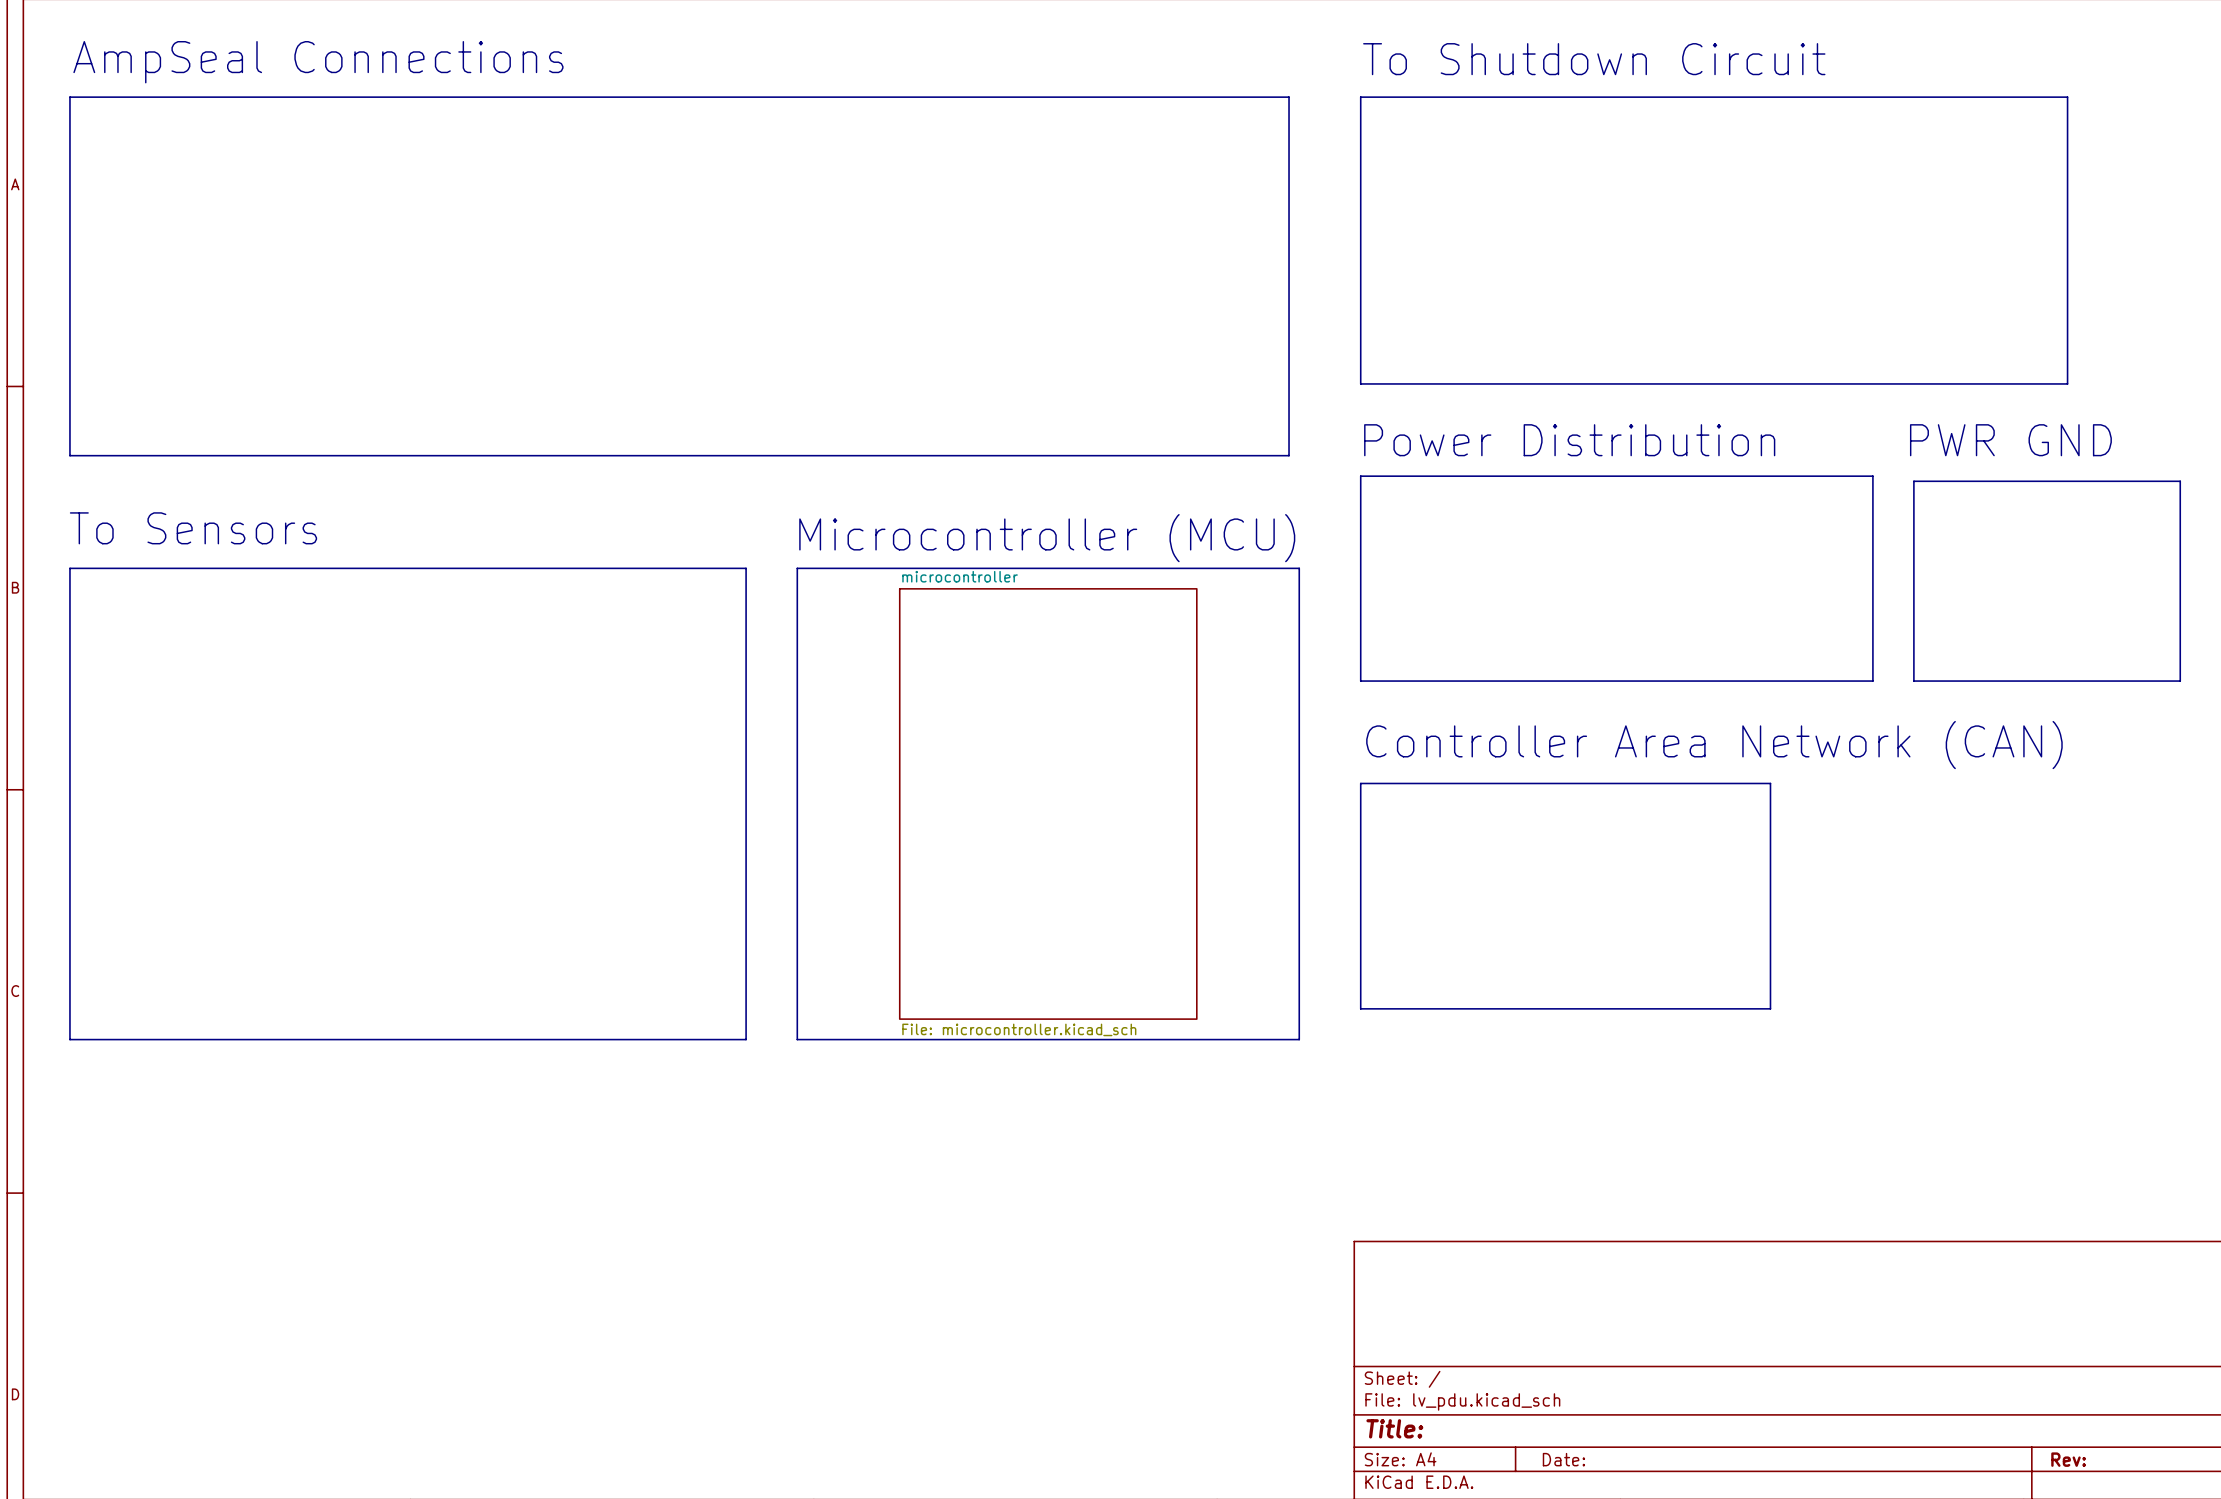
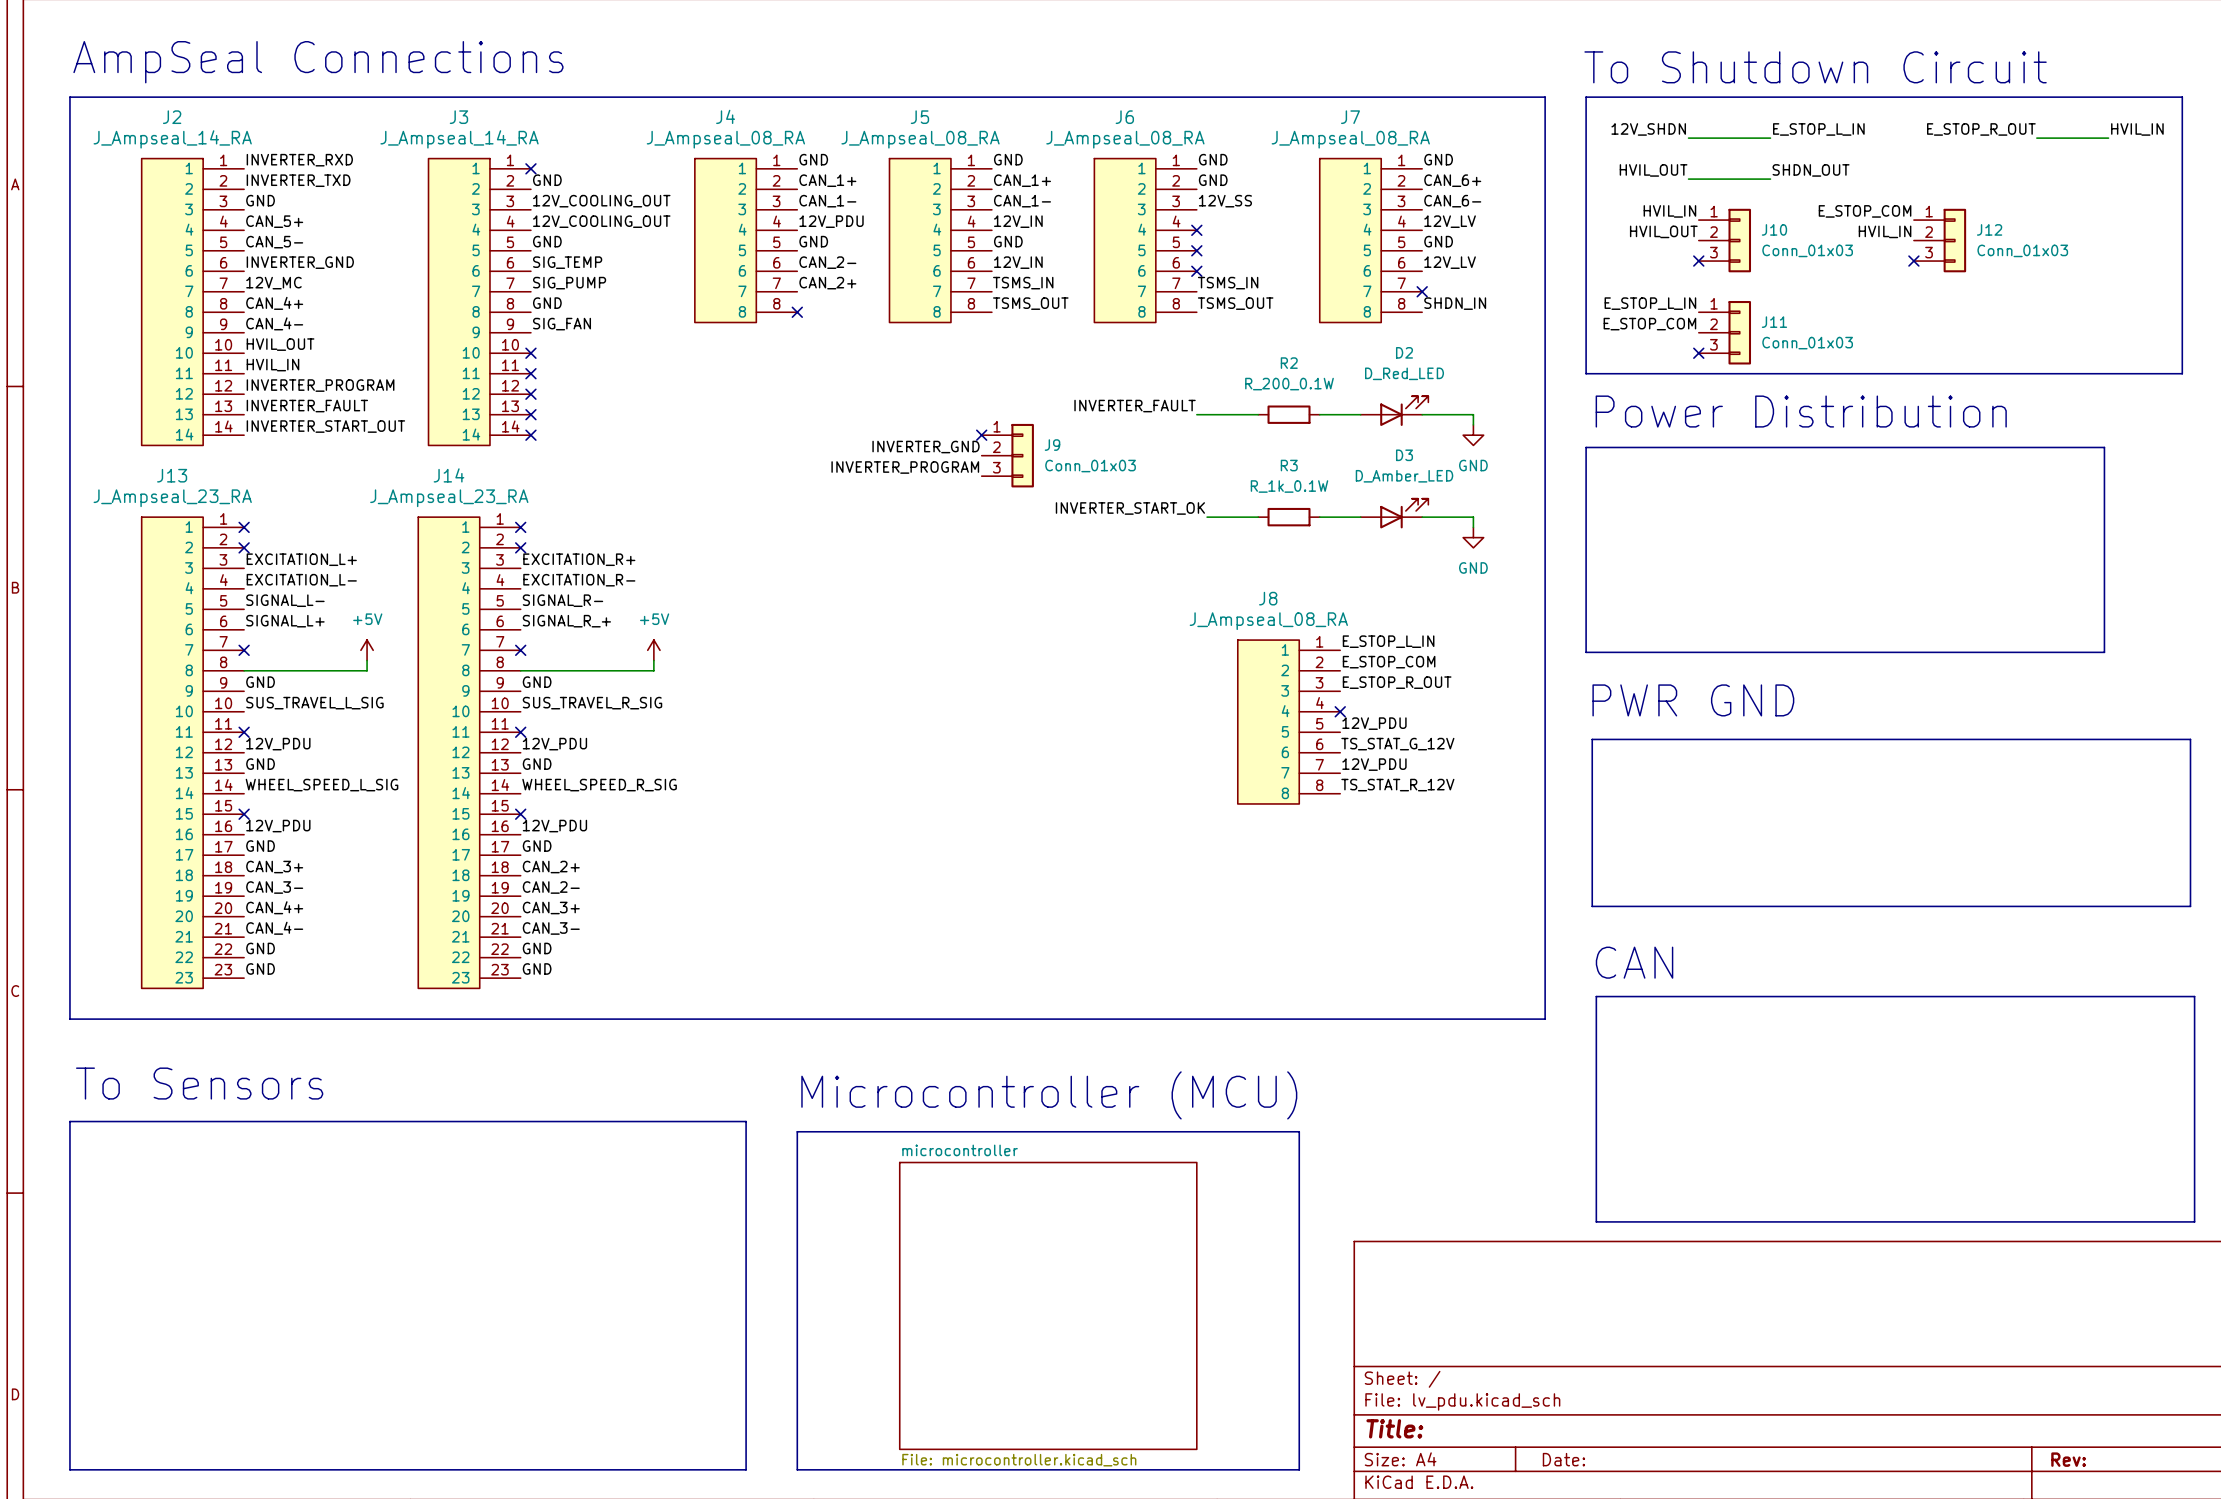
text: To Shutdown Circuit (1594, 59) -> none
text: none -> To Shutdown Circuit (1815, 67)
line: (1289, 97) (1289, 455) (69, 455) -> (1289, 97) (1360, 97)
line: (1360, 97) (1360, 383) (2067, 383) (2067, 97) -> (1586, 97) (1586, 373) (2182, 373) (2182, 97) (2067, 97)
line: (1545, 97) (1586, 97) -> (1545, 97) (1545, 1019) (69, 1019)
label: none -> 12V_SHDN (1648, 129)
label: none -> E_STOP_L_IN (1818, 129)
label: none -> E_STOP_R_OUT (1981, 129)
label: none -> HVIL_IN (2137, 129)
wire: none -> (1688, 138) (1770, 138)
wire: none -> (2036, 138) (2108, 138)
label: none -> GND (813, 159)
label: none -> GND (1008, 159)
label: none -> GND (1213, 159)
label: none -> GND (1438, 159)
label: none -> INVERTER_RXD (299, 160)
no-connect mark: none -> (530, 168)
label: none -> HVIL_OUT (1653, 170)
label: none -> SHDN_OUT (1811, 170)
wire: none -> (1688, 179) (1770, 179)
label: none -> INVERTER_TXD (298, 180)
label: none -> GND (547, 180)
label: none -> CAN_1+ (827, 180)
label: none -> CAN_1+ (1022, 180)
label: none -> GND (1213, 180)
label: none -> CAN_6+ (1452, 180)
label: none -> GND (260, 200)
label: none -> 12V_COOLING_OUT (601, 201)
label: none -> CAN_1- (827, 201)
label: none -> CAN_1- (1022, 201)
label: none -> 12V_SS (1225, 201)
label: none -> CAN_6- (1452, 201)
label: none -> HVIL_IN (1669, 211)
label: none -> E_STOP_COM (1865, 211)
label: none -> CAN_5+ (274, 221)
label: none -> 12V_COOLING_OUT (601, 221)
label: none -> 12V_PDU (831, 221)
label: none -> 12V_IN (1018, 221)
label: none -> 12V_LV (1450, 221)
no-connect mark: none -> (1196, 230)
label: none -> HVIL_OUT (1663, 231)
label: none -> HVIL_IN (1885, 231)
J4: none -> J_Ampseal_08_RA (746, 240)
J5: none -> J_Ampseal_08_RA (940, 240)
J6: none -> J_Ampseal_08_RA (1145, 240)
J7: none -> J_Ampseal_08_RA (1370, 240)
J10: none -> Conn_01x03 (1724, 240)
J12: none -> Conn_01x03 (1940, 240)
label: none -> GND (547, 241)
label: none -> GND (813, 241)
label: none -> GND (1008, 241)
label: none -> GND (1438, 241)
label: none -> CAN_5- (274, 242)
no-connect mark: none -> (1196, 250)
no-connect mark: none -> (1698, 261)
no-connect mark: none -> (1913, 261)
label: none -> INVERTER_GND (300, 262)
label: none -> SIG_TEMP (567, 262)
label: none -> CAN_2- (827, 262)
label: none -> 12V_IN (1018, 262)
label: none -> 12V_LV (1450, 262)
no-connect mark: none -> (1196, 271)
label: none -> 12V_MC (273, 283)
label: none -> SIG_PUMP (569, 283)
label: none -> CAN_2+ (827, 283)
label: none -> TSMS_IN (1023, 283)
label: none -> TSMS_IN (1228, 283)
no-connect mark: none -> (1422, 291)
J2: none -> J_Ampseal_14_RA (192, 302)
J3: none -> J_Ampseal_14_RA (479, 302)
label: none -> CAN_4+ (274, 303)
label: none -> GND (547, 303)
label: none -> TSMS_OUT (1030, 303)
label: none -> TSMS_OUT (1235, 303)
label: none -> SHDN_IN (1455, 303)
label: none -> E_STOP_L_IN (1650, 303)
no-connect mark: none -> (797, 312)
label: none -> CAN_4- (274, 323)
label: none -> SIG_FAN (562, 324)
label: none -> E_STOP_COM (1649, 324)
J11: none -> Conn_01x03 (1724, 332)
label: none -> HVIL_OUT (280, 344)
no-connect mark: none -> (530, 353)
no-connect mark: none -> (1698, 353)
label: none -> HVIL_IN (272, 365)
no-connect mark: none -> (530, 373)
label: none -> INVERTER_PROGRAM (320, 385)
no-connect mark: none -> (530, 394)
label: none -> INVERTER_FAULT (307, 406)
label: none -> INVERTER_FAULT (1135, 406)
D2: none -> D_Red_LED (1394, 411)
text: none -> Power Distribution (1801, 411)
no-connect mark: none -> (530, 414)
wire: none -> (1196, 414) (1258, 414)
R2: none -> R_200_0.1W (1289, 414)
wire: none -> (1319, 414) (1360, 414)
wire: none -> (1422, 414) (1473, 414) (1473, 424)
label: none -> INVERTER_START_OUT (325, 426)
no-connect mark: none -> (530, 435)
no-connect mark: none -> (981, 435)
power symbol: none -> GND (1473, 435)
text: Power Distribution (1569, 440) -> none
text: PWR GND (2010, 440) -> none
label: none -> INVERTER_GND (926, 447)
line: none -> (1586, 447) (2104, 447) (2104, 652) (1586, 652) (1586, 447)
J9: none -> Conn_01x03 (1007, 455)
label: none -> INVERTER_PROGRAM (905, 467)
line: (1360, 476) (1872, 476) (1872, 681) (1360, 681) (1360, 476) -> none
line: (1913, 481) (2180, 481) (2180, 681) (1913, 681) (1913, 481) -> none
label: none -> INVERTER_START_OK (1130, 508)
D3: none -> D_Amber_LED (1394, 513)
wire: none -> (1207, 517) (1258, 517)
R3: none -> R_1k_0.1W (1289, 517)
wire: none -> (1319, 517) (1360, 517)
wire: none -> (1422, 517) (1473, 517) (1473, 527)
no-connect mark: none -> (244, 527)
no-connect mark: none -> (520, 527)
text: To Sensors (193, 528) -> none
power symbol: none -> GND (1473, 537)
text: Microcontroller (MCU) (1047, 538) -> none
no-connect mark: none -> (244, 547)
no-connect mark: none -> (520, 547)
label: none -> EXCITATION_L+ (301, 559)
label: none -> EXCITATION_R+ (579, 559)
line: (69, 568) (746, 568) (746, 1039) (69, 1039) (69, 1019) -> (69, 568) (69, 455)
line: (797, 568) (1299, 568) (1299, 1039) (797, 1039) (797, 568) -> none
label: none -> EXCITATION_L- (301, 580)
label: none -> EXCITATION_R- (579, 580)
label: none -> SIGNAL_L- (285, 600)
label: none -> SIGNAL_R- (562, 600)
label: none -> SIGNAL_L+ (285, 621)
label: none -> SIGNAL_R_+ (566, 621)
label: none -> E_STOP_L_IN (1388, 641)
no-connect mark: none -> (244, 650)
power symbol: none -> +5V (367, 650)
no-connect mark: none -> (520, 650)
power symbol: none -> +5V (653, 650)
wire: none -> (367, 660) (367, 670) (244, 670)
wire: none -> (653, 660) (653, 670) (520, 670)
label: none -> E_STOP_COM (1389, 662)
label: none -> GND (260, 682)
label: none -> GND (537, 682)
label: none -> E_STOP_R_OUT (1397, 682)
text: none -> PWR GND (1693, 700)
label: none -> SUS_TRAVEL_L_SIG (314, 703)
label: none -> SUS_TRAVEL_R_SIG (592, 703)
no-connect mark: none -> (1340, 711)
J8: none -> J_Ampseal_08_RA (1289, 722)
label: none -> 12V_PDU (1374, 723)
no-connect mark: none -> (244, 732)
no-connect mark: none -> (520, 732)
line: none -> (1592, 739) (2190, 739) (2190, 906) (1592, 906) (1592, 739)
label: none -> 12V_PDU (278, 744)
label: none -> 12V_PDU (554, 744)
label: none -> TS_STAT_G_12V (1397, 744)
text: Controller Area Network (CAN) (1714, 745) -> none
J13: none -> J_Ampseal_23_RA (192, 752)
J14: none -> J_Ampseal_23_RA (469, 752)
label: none -> GND (260, 764)
label: none -> GND (537, 764)
label: none -> 12V_PDU (1374, 764)
line: (1360, 783) (1360, 1008) (1770, 1008) (1770, 783) (1360, 783) -> none
label: none -> WHEEL_SPEED_L_SIG (322, 785)
label: none -> WHEEL_SPEED_R_SIG (599, 785)
label: none -> TS_STAT_R_12V (1397, 785)
sheet microcontroller: File: microcontroller.kicad_sch (1048, 803) -> none
no-connect mark: none -> (244, 814)
no-connect mark: none -> (520, 814)
label: none -> 12V_PDU (278, 826)
label: none -> 12V_PDU (554, 826)
label: none -> GND (260, 846)
label: none -> GND (537, 846)
label: none -> CAN_3+ (274, 867)
label: none -> CAN_2+ (551, 867)
label: none -> CAN_3- (274, 887)
label: none -> CAN_2- (551, 887)
label: none -> CAN_4+ (274, 907)
label: none -> CAN_3+ (551, 908)
label: none -> CAN_4- (274, 928)
label: none -> CAN_3- (551, 928)
label: none -> GND (260, 948)
label: none -> GND (537, 948)
text: none -> CAN (1634, 962)
label: none -> GND (260, 968)
label: none -> GND (537, 968)
line: none -> (1596, 996) (2194, 996) (2194, 1221) (1596, 1221) (1596, 996)
text: none -> To Sensors (199, 1083)
text: none -> Microcontroller (MCU) (1049, 1095)
line: none -> (69, 1121) (746, 1121) (746, 1469) (69, 1469) (69, 1121)
line: none -> (797, 1131) (1299, 1131) (1299, 1469) (797, 1469) (797, 1131)
sheet microcontroller: none -> File: microcontroller.kicad_sch (1048, 1305)

